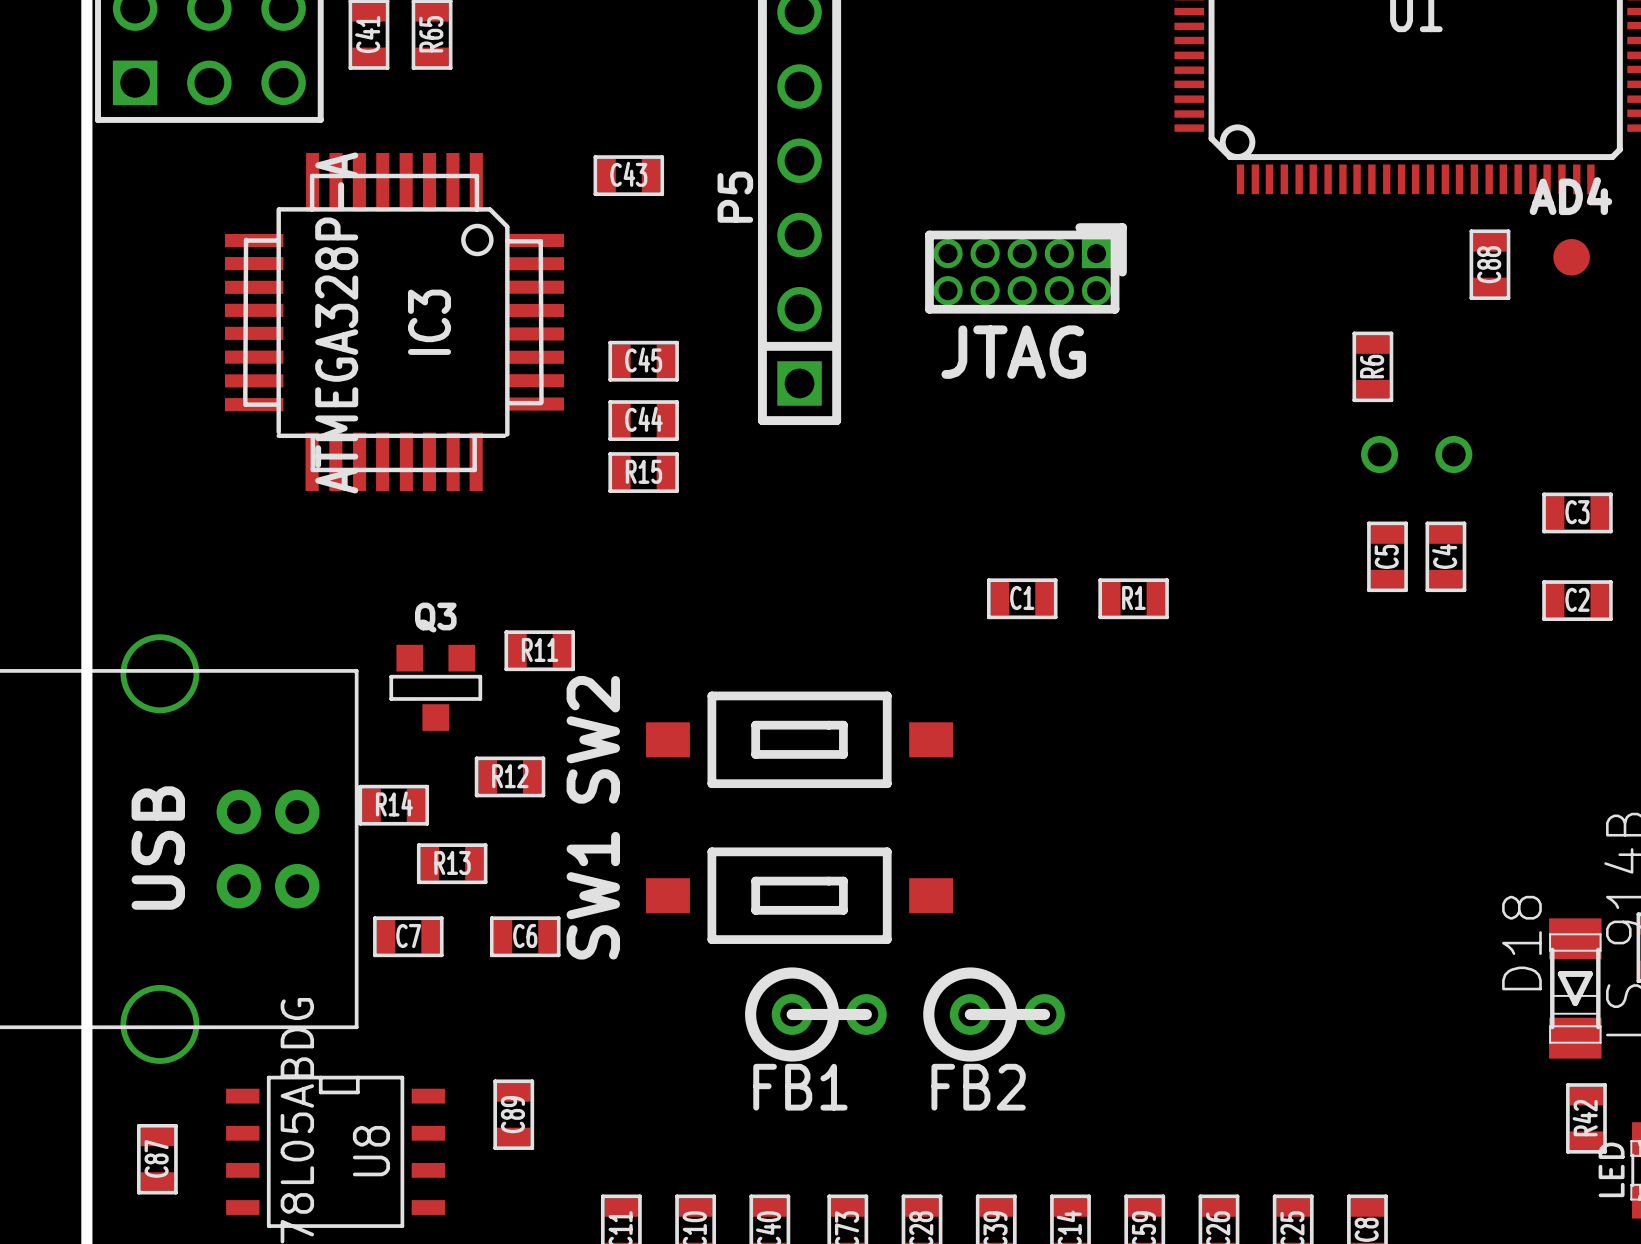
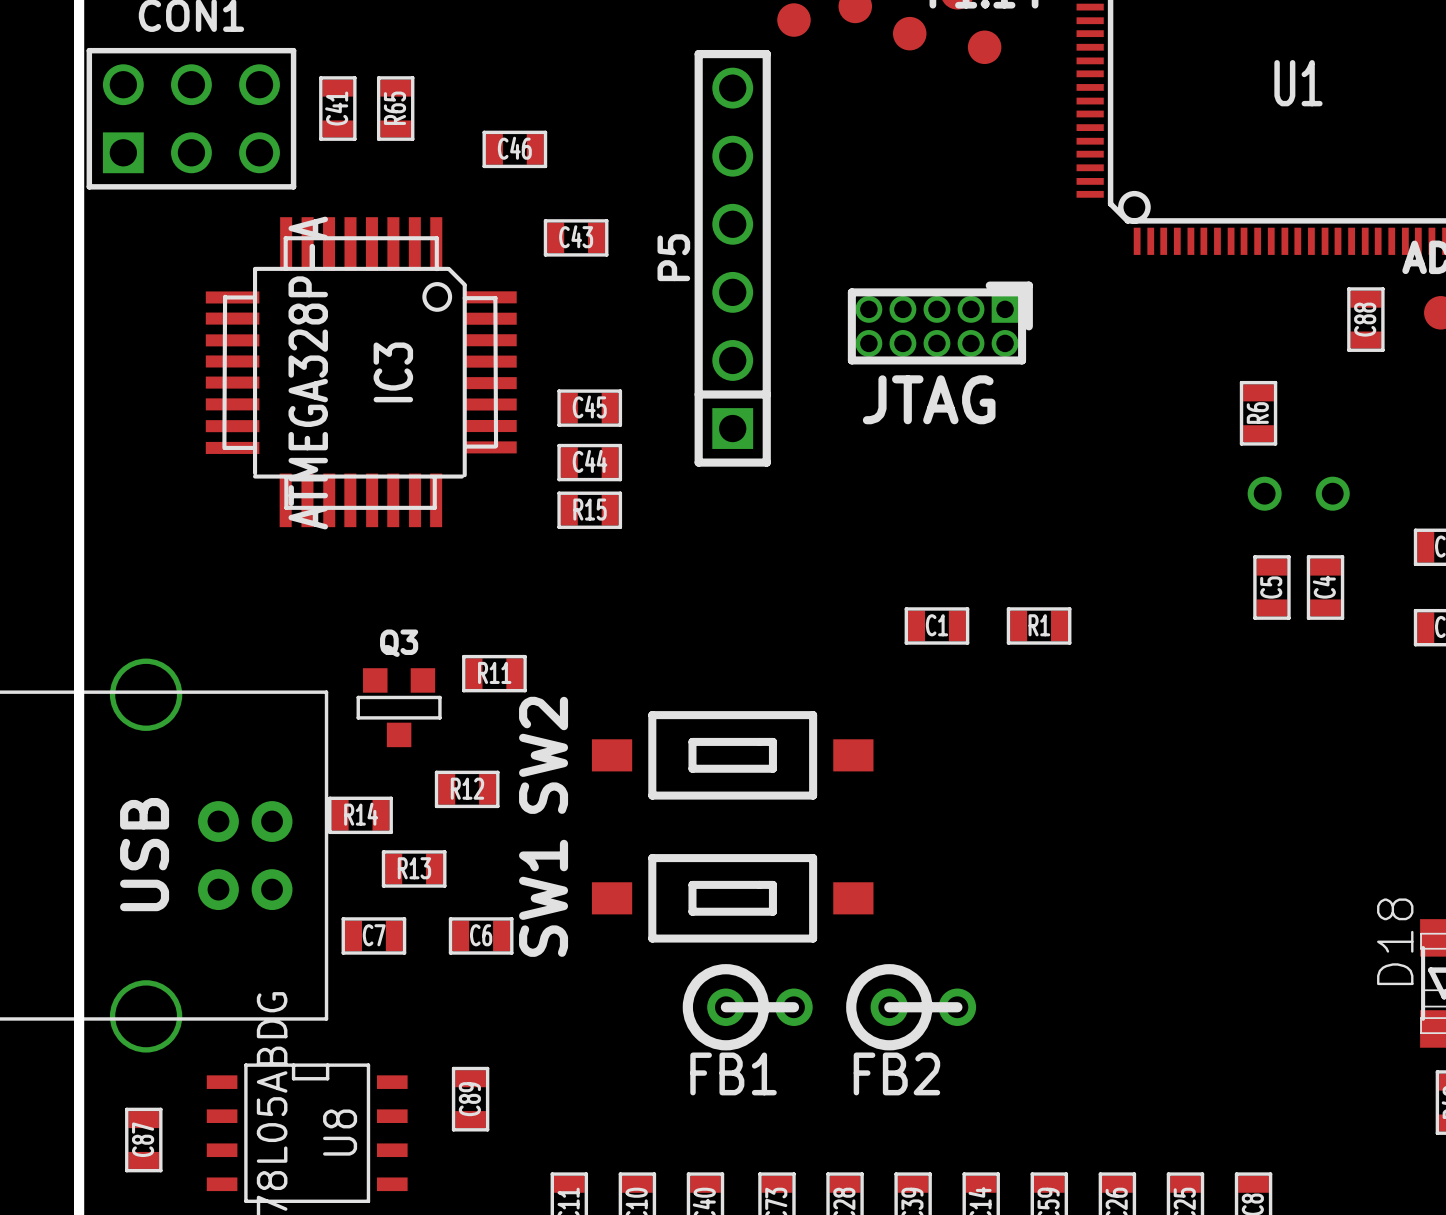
C46: none -> (514, 149)

